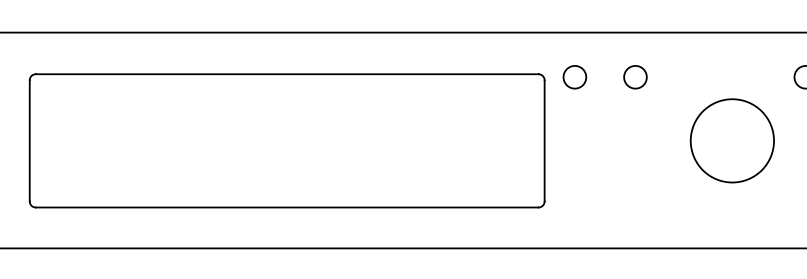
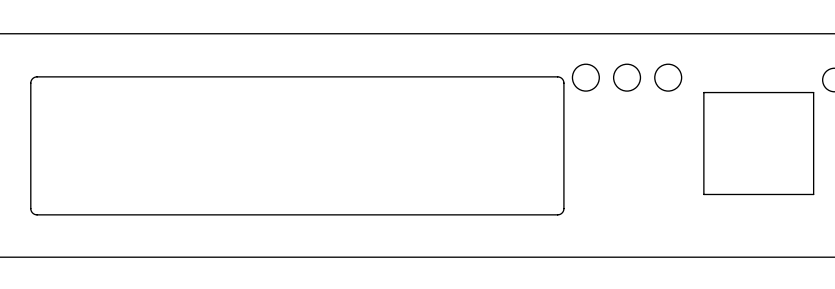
round board edge: none -> [572, 64, 600, 92]
round board edge: none -> [613, 64, 641, 92]
round board edge: none -> [654, 64, 682, 92]
round board edge: [562, 65, 587, 90] -> none
round board edge: [623, 65, 648, 90] -> none
board edge: none -> (813, 92) (703, 92) (703, 194) (813, 194) (813, 92)
round board edge: [690, 98, 775, 184] -> none

